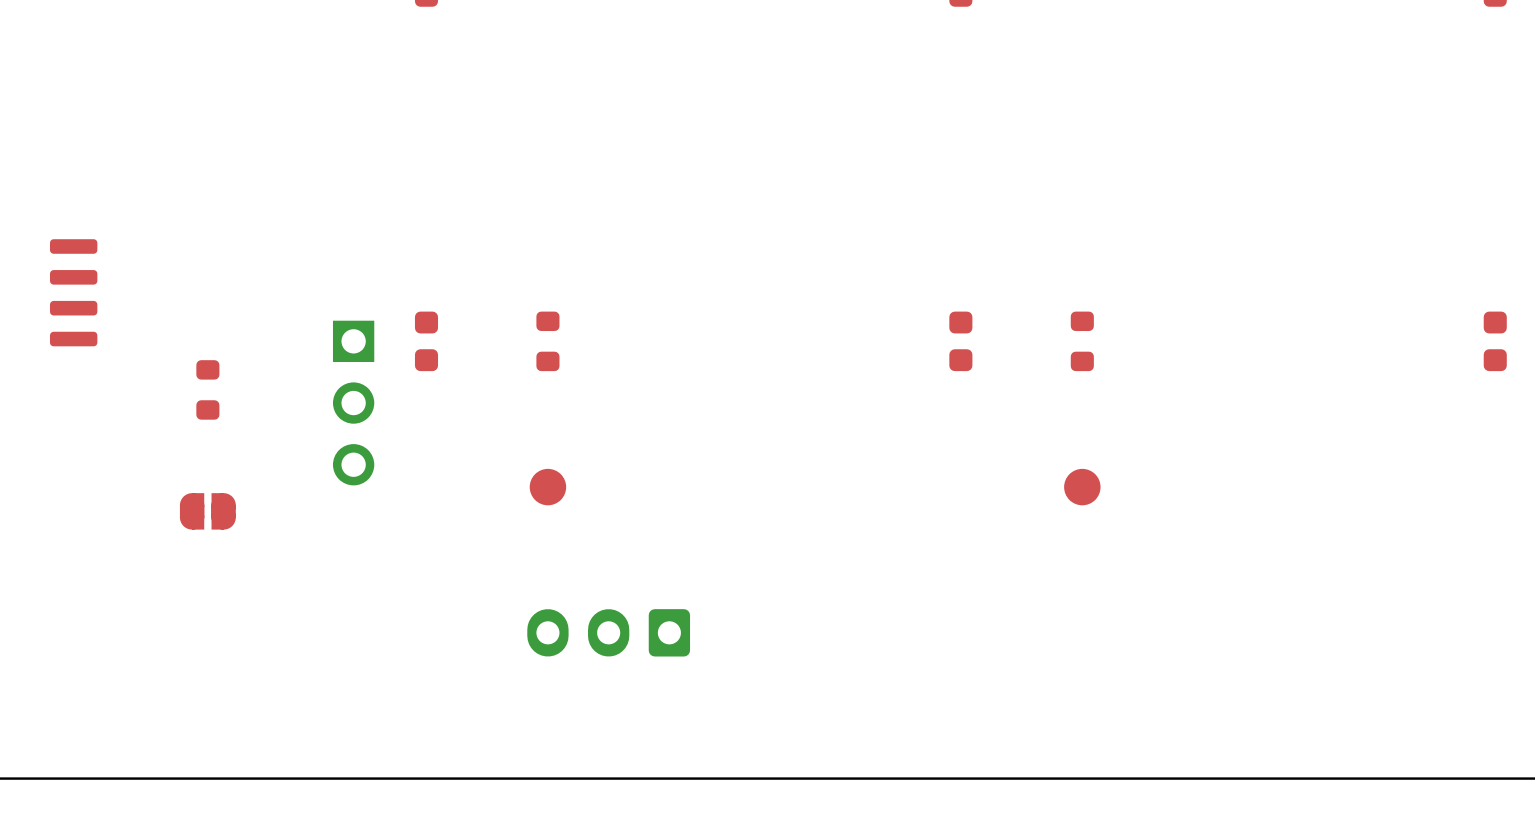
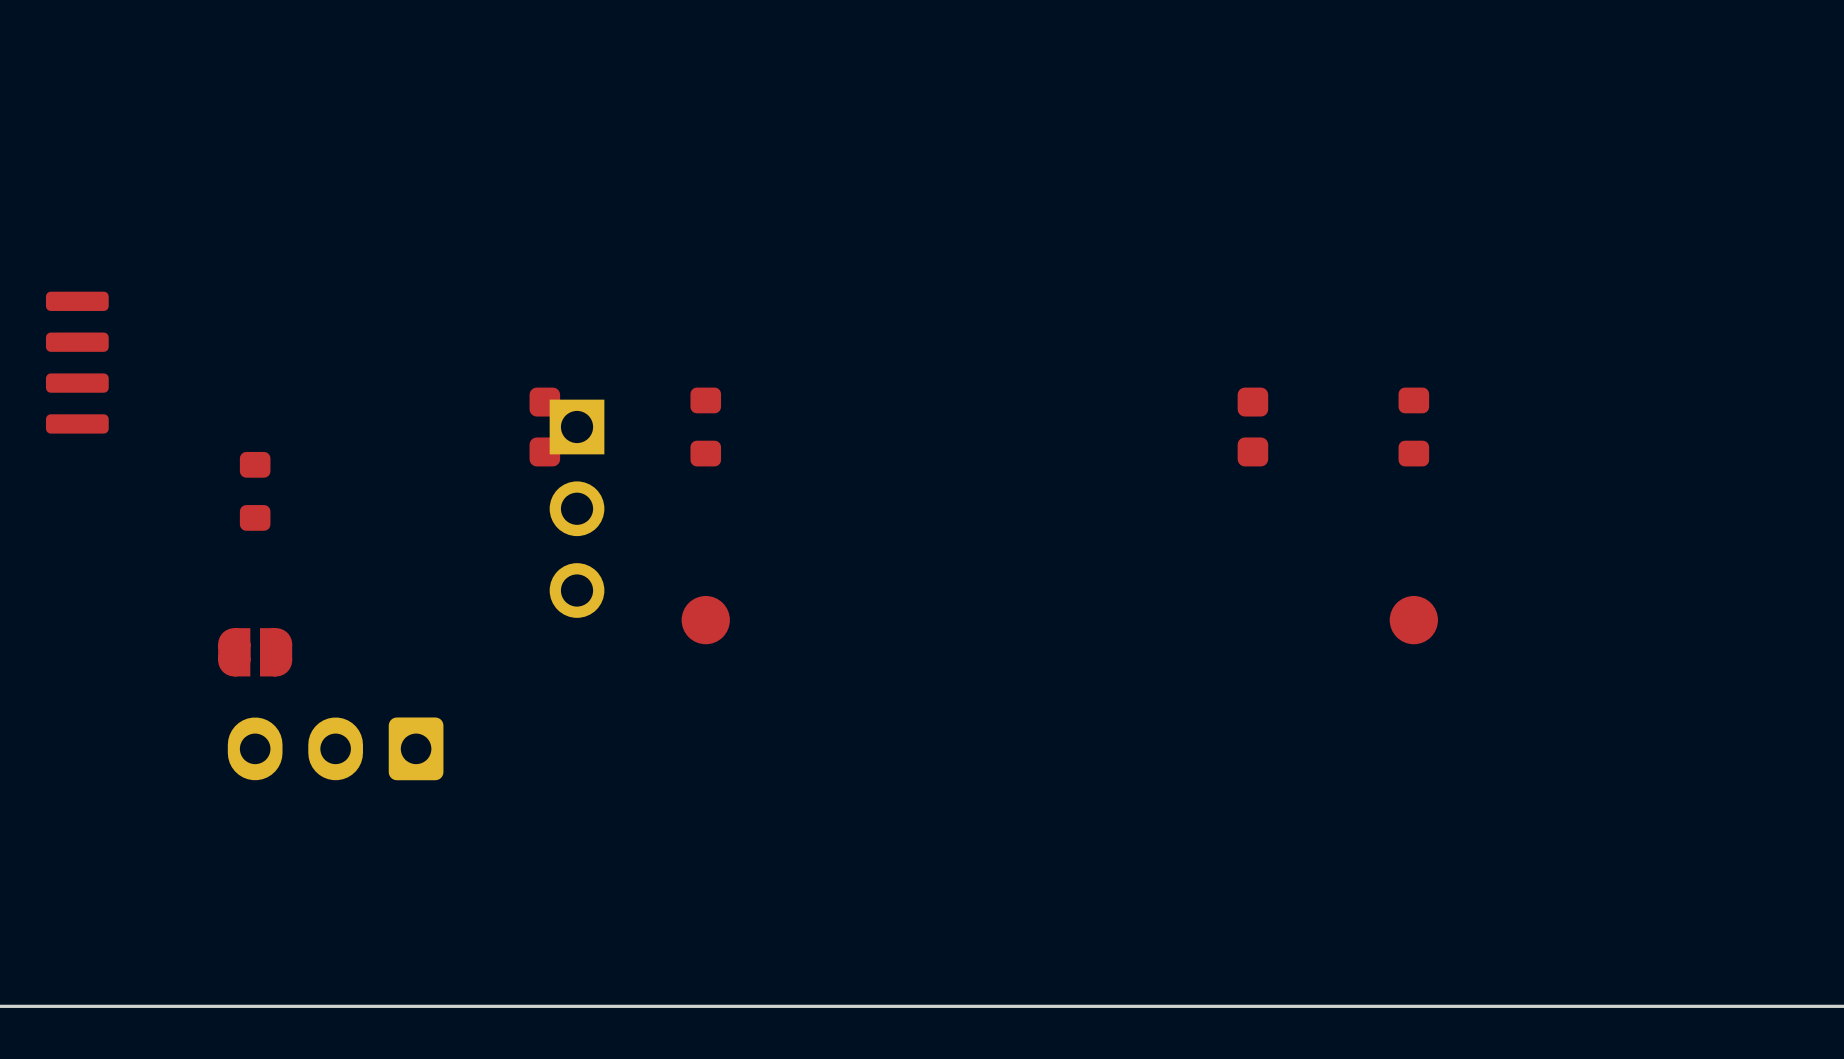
part position: (353, 403) -> (577, 508)
part position: (608, 632) -> (335, 748)

